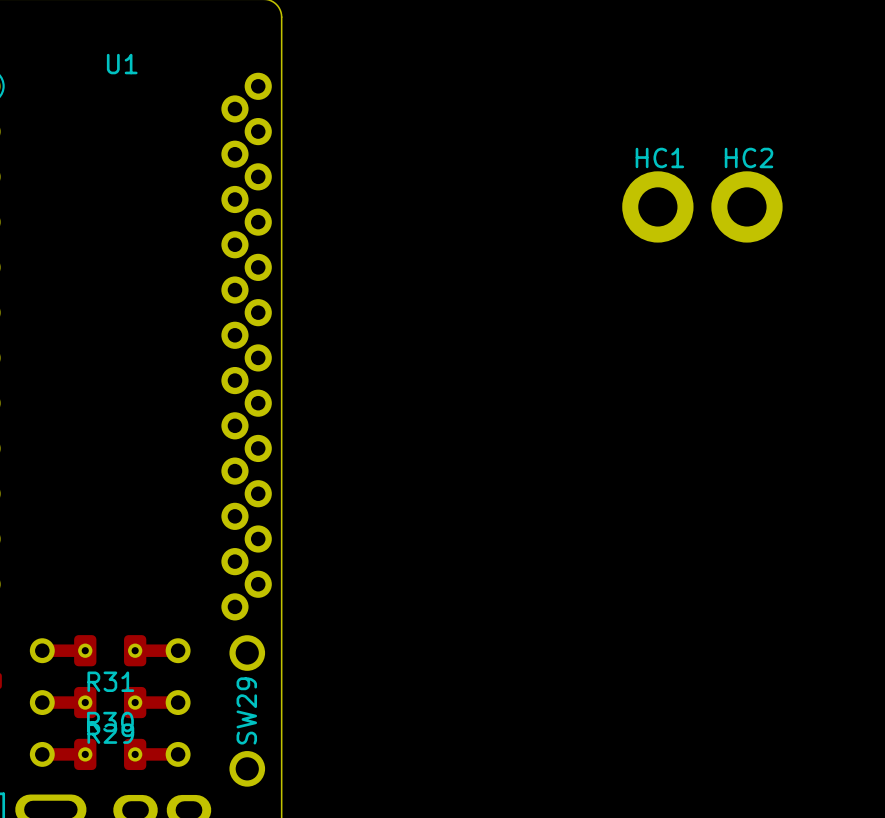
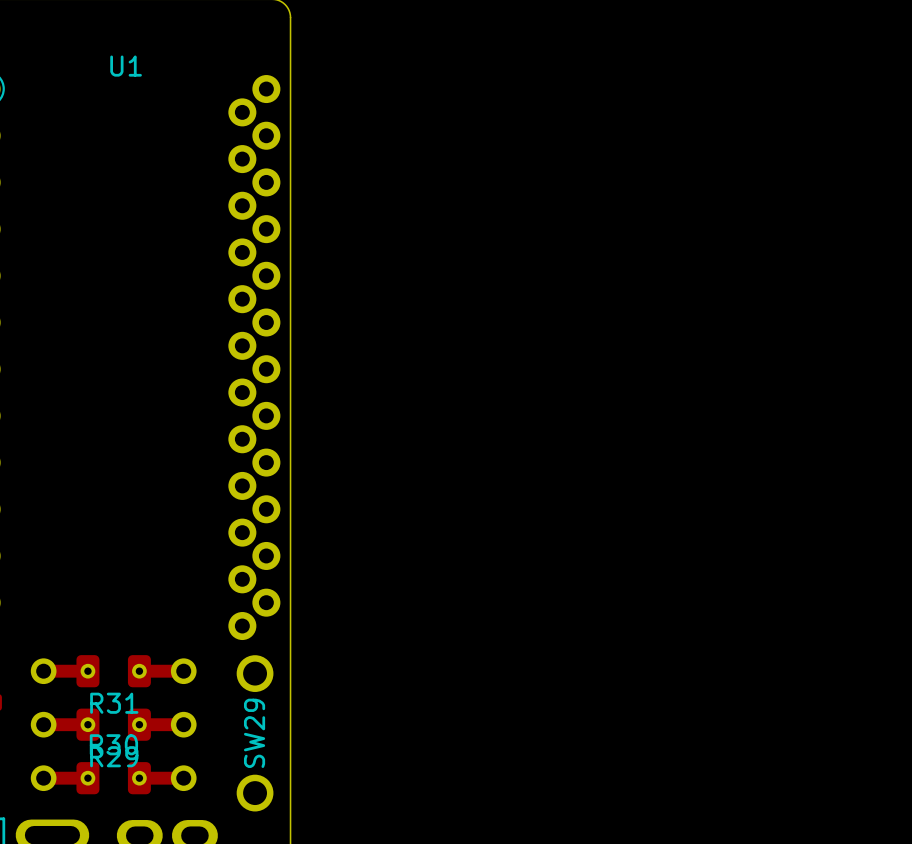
HC1: (657, 206) -> none
HC2: (746, 206) -> none

